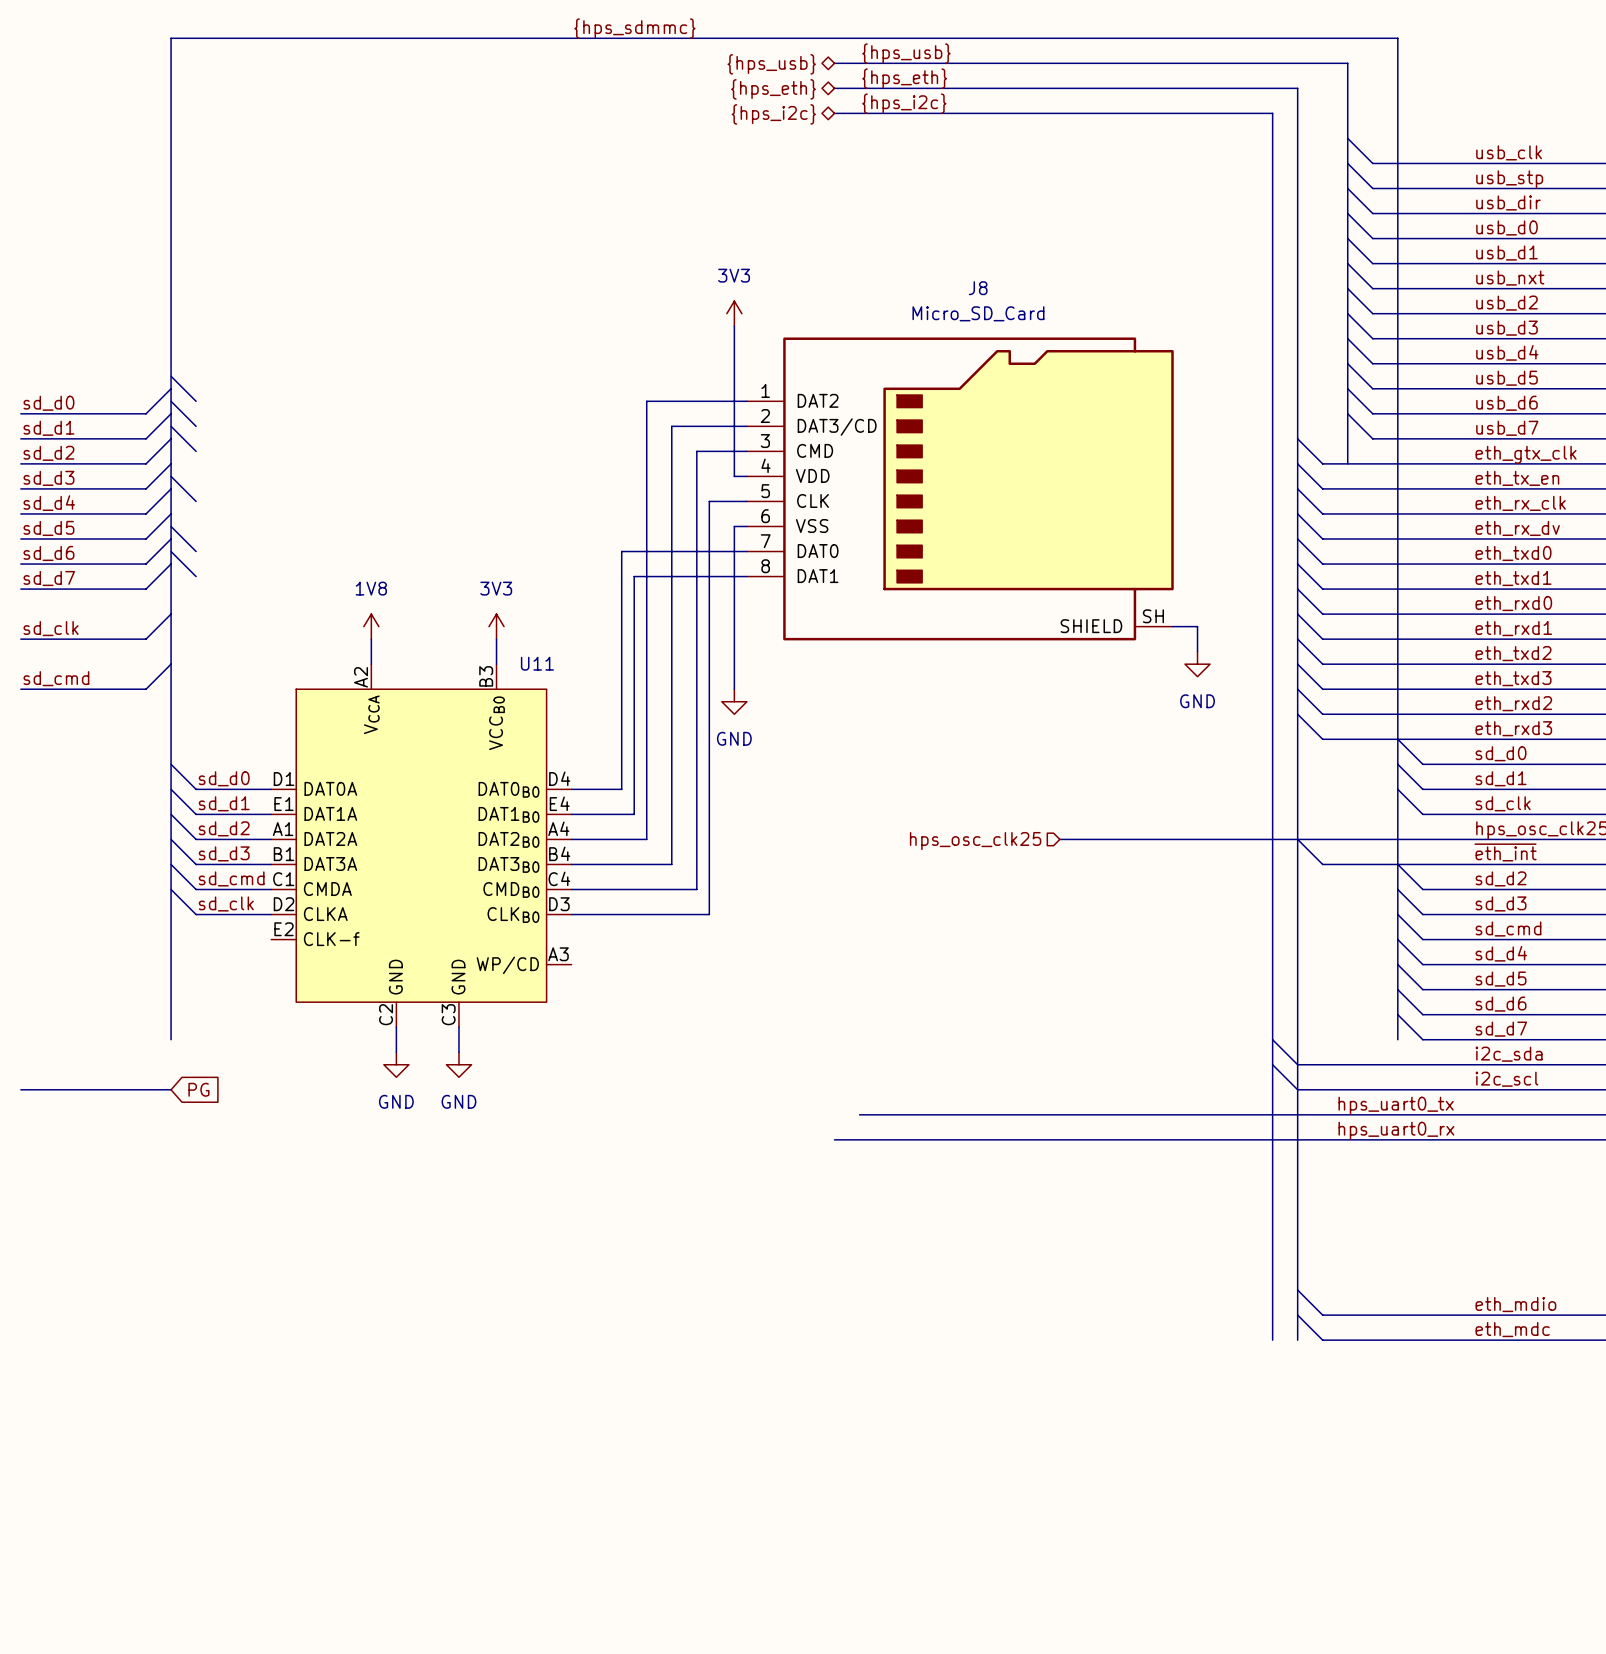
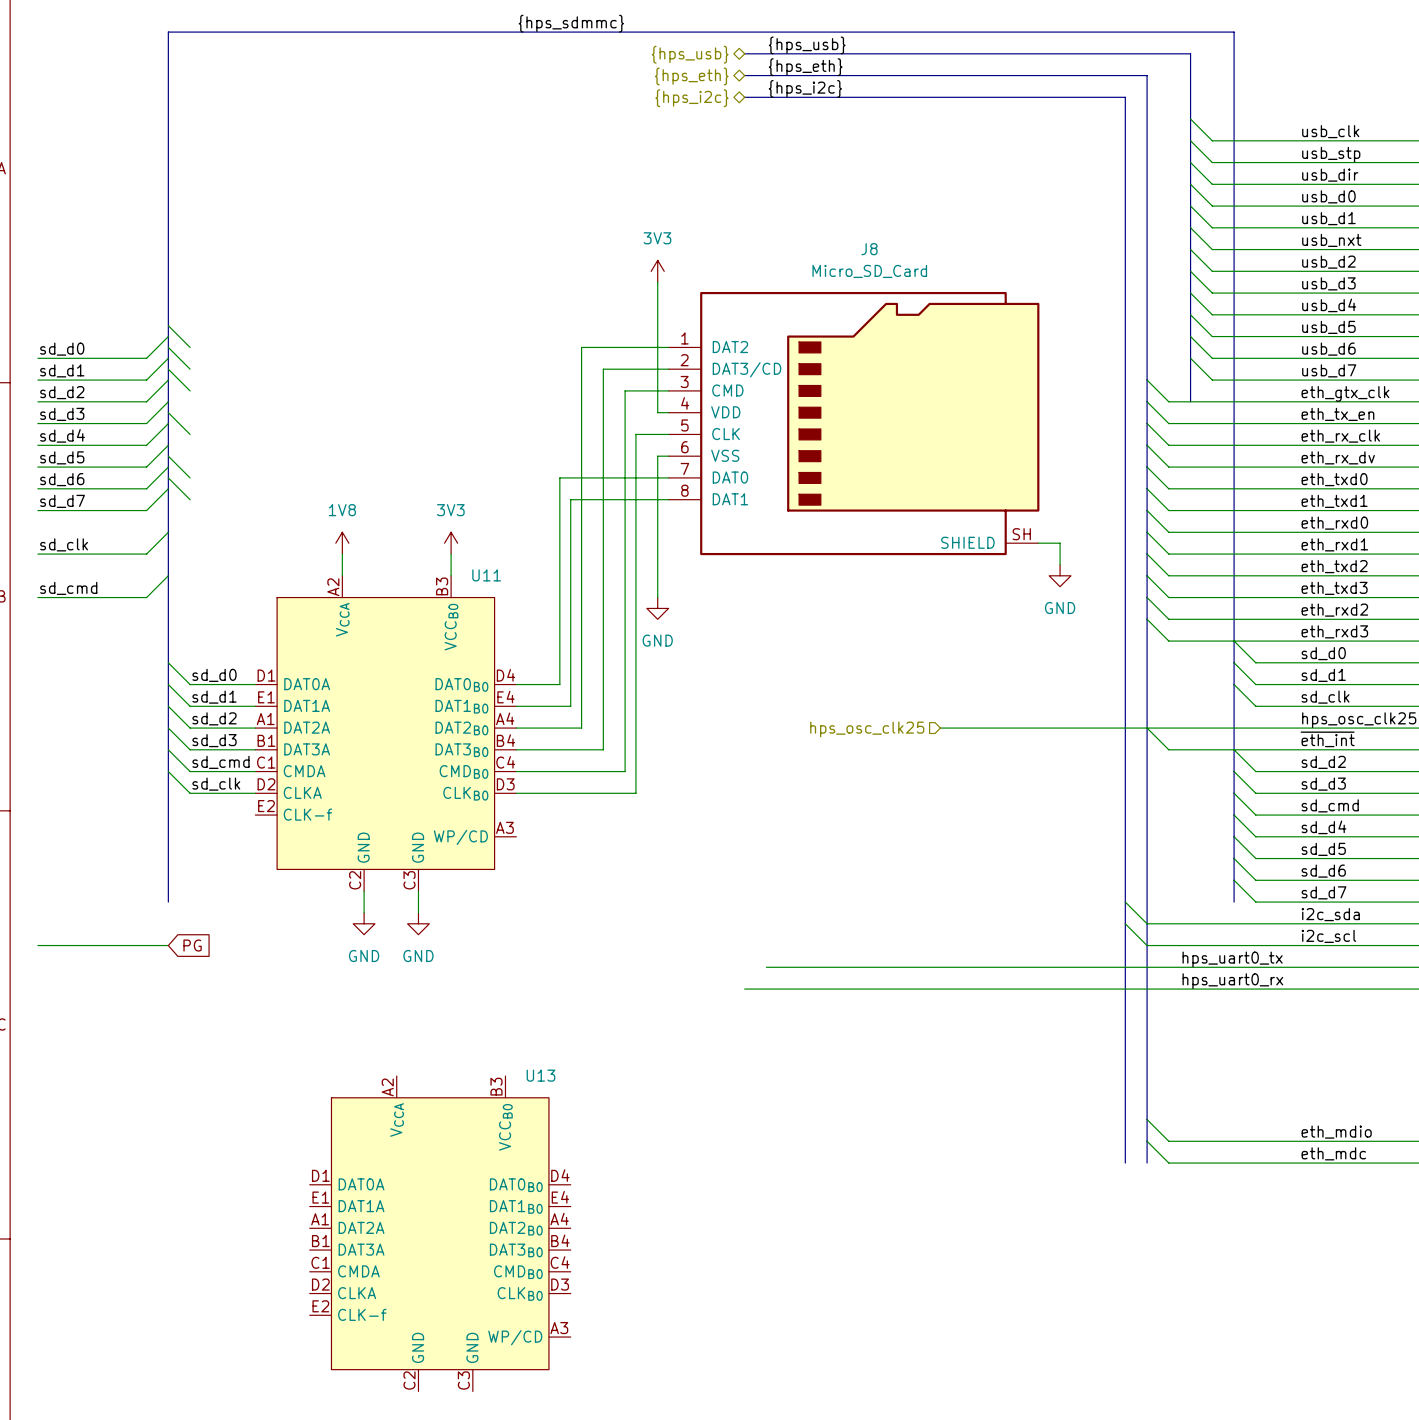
U13: none -> (440, 1233)

